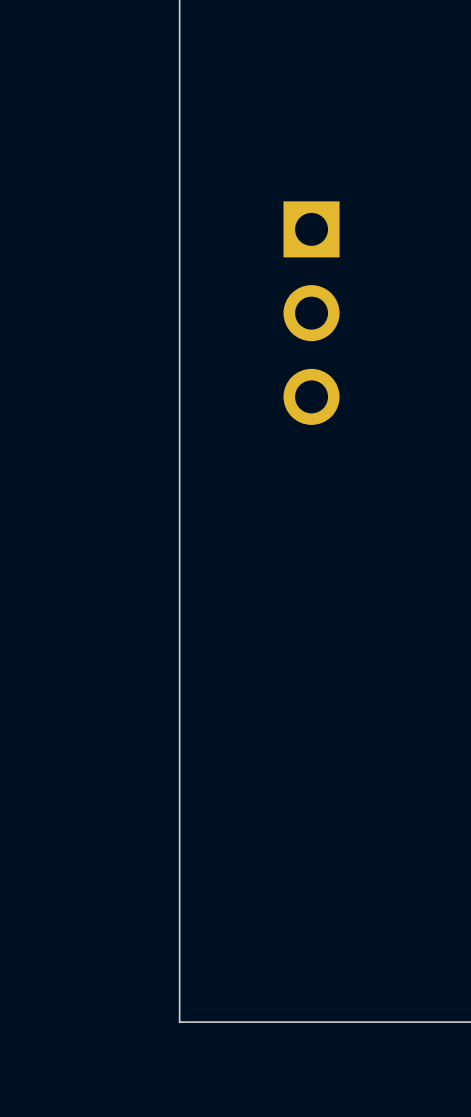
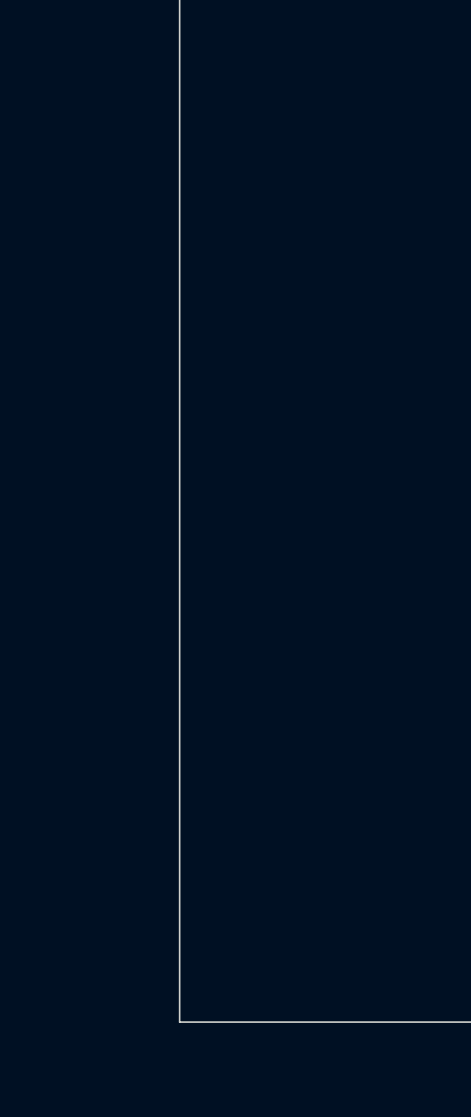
part: (311, 313) -> none

